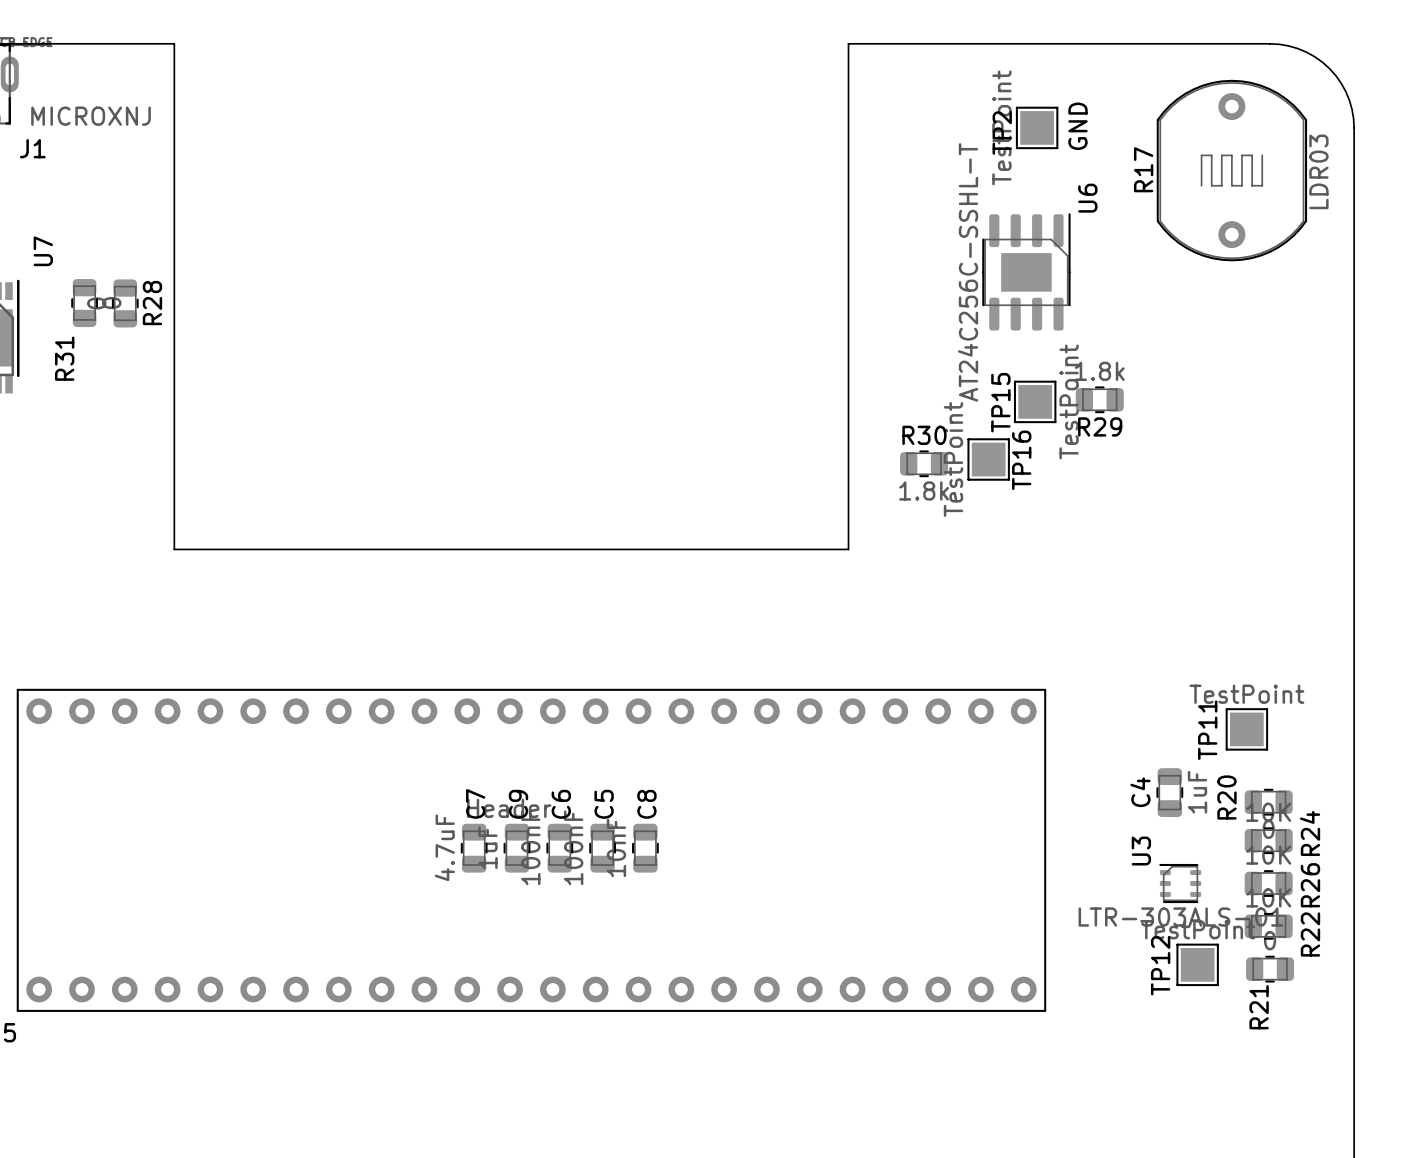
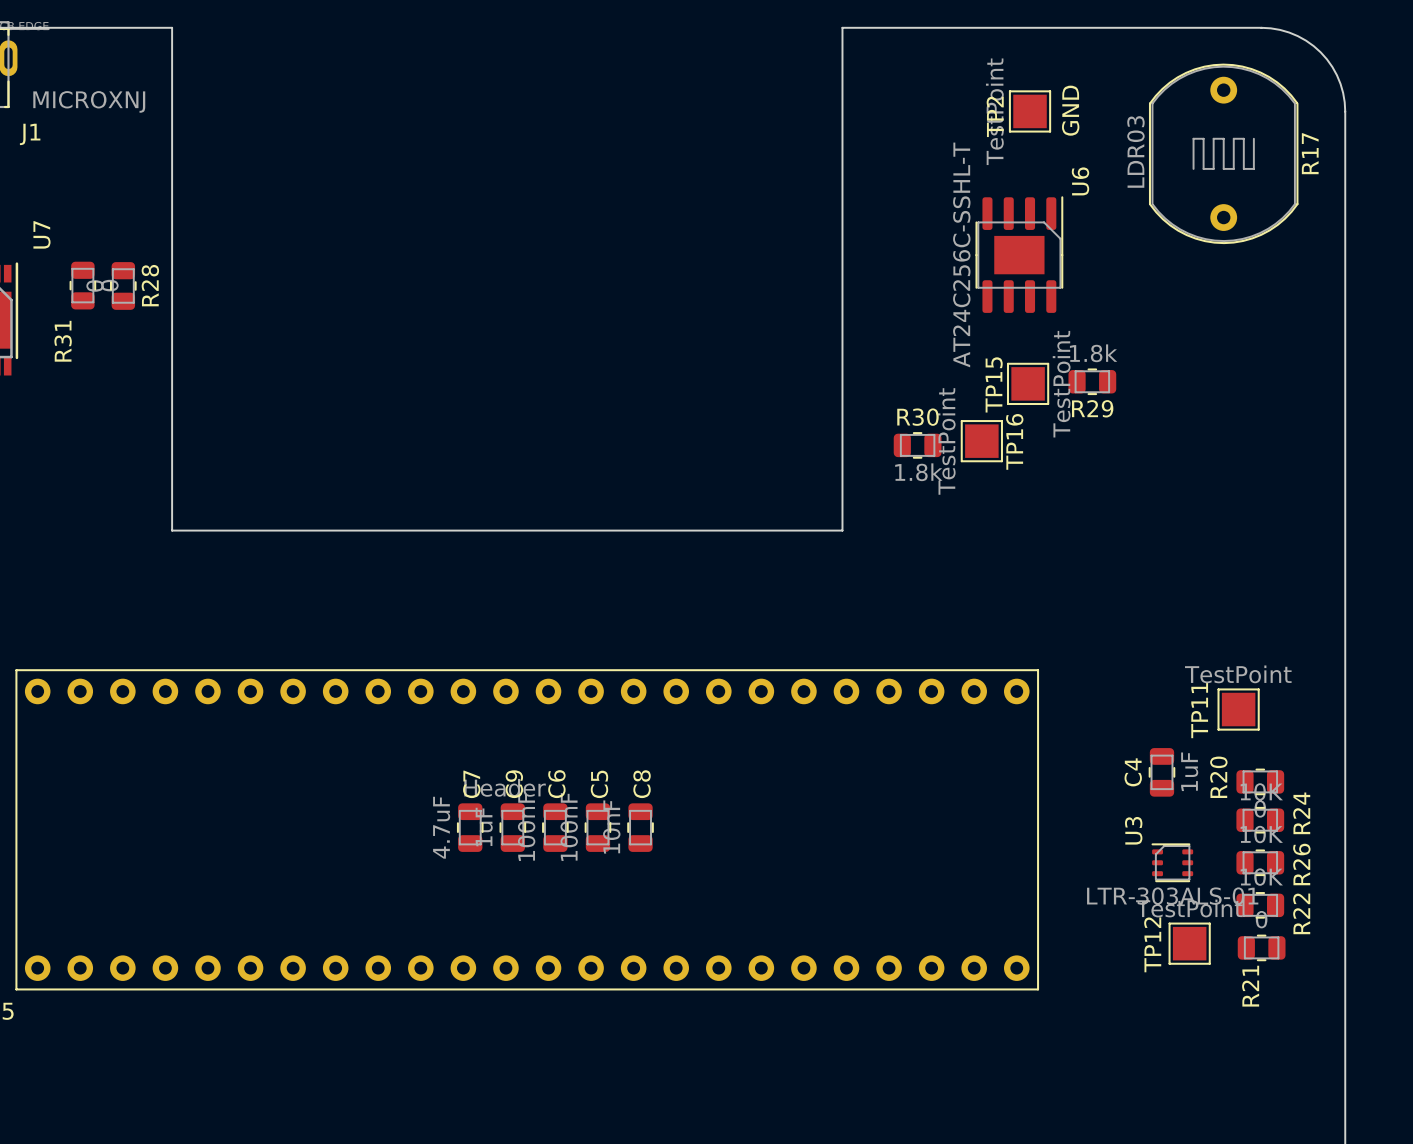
R17 name position: R17 (1143, 169) -> R17 (1310, 153)
R17 value position: LDR03 (1318, 171) -> LDR03 (1135, 151)

